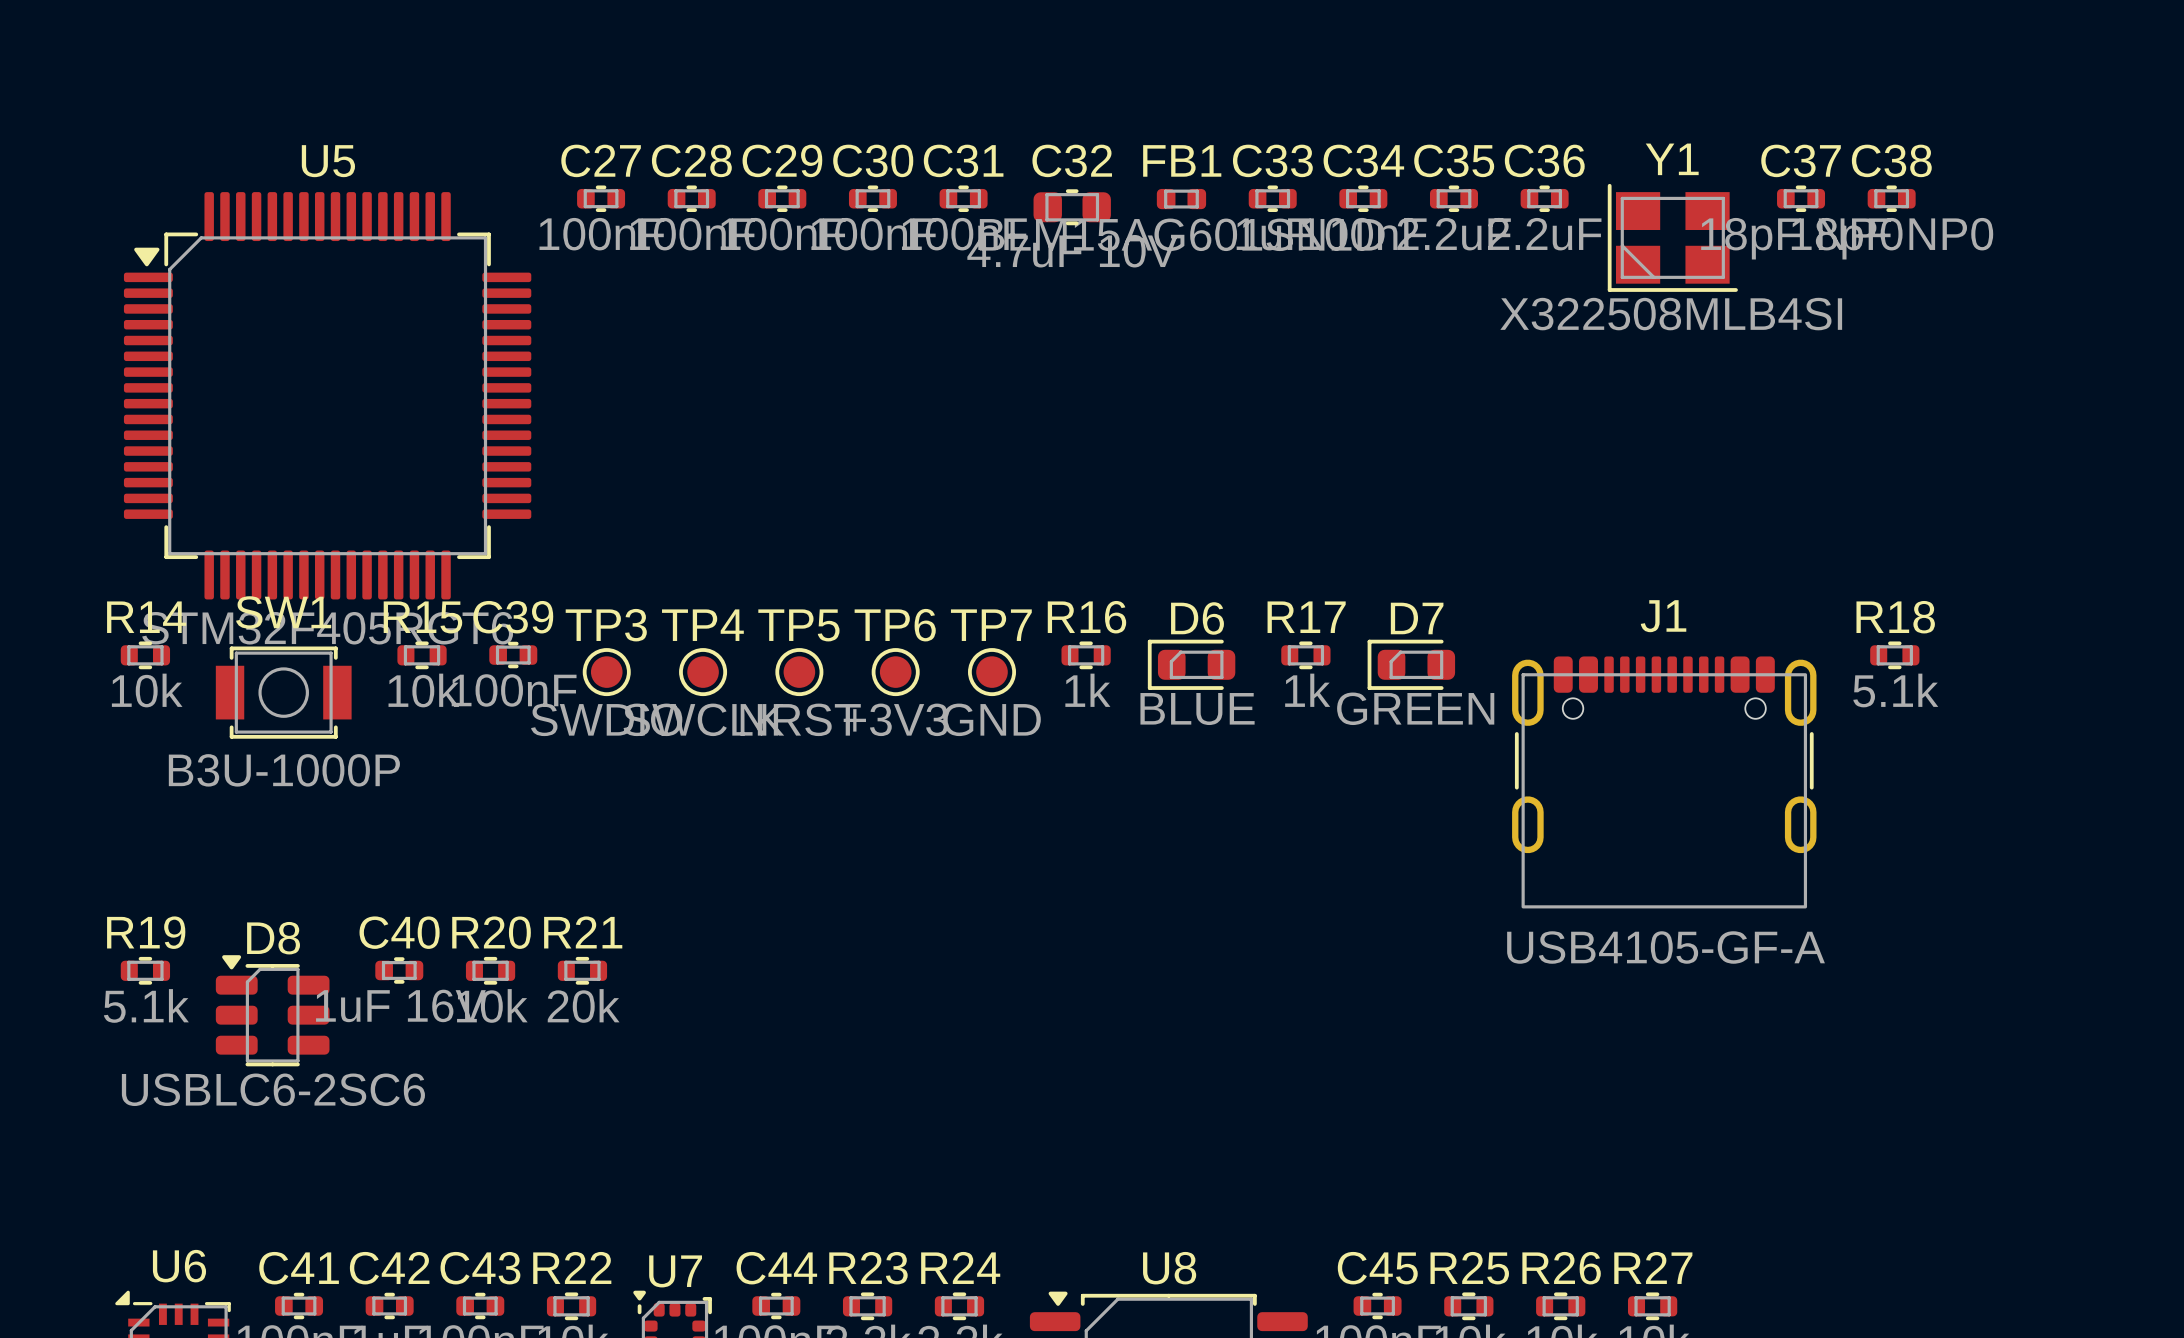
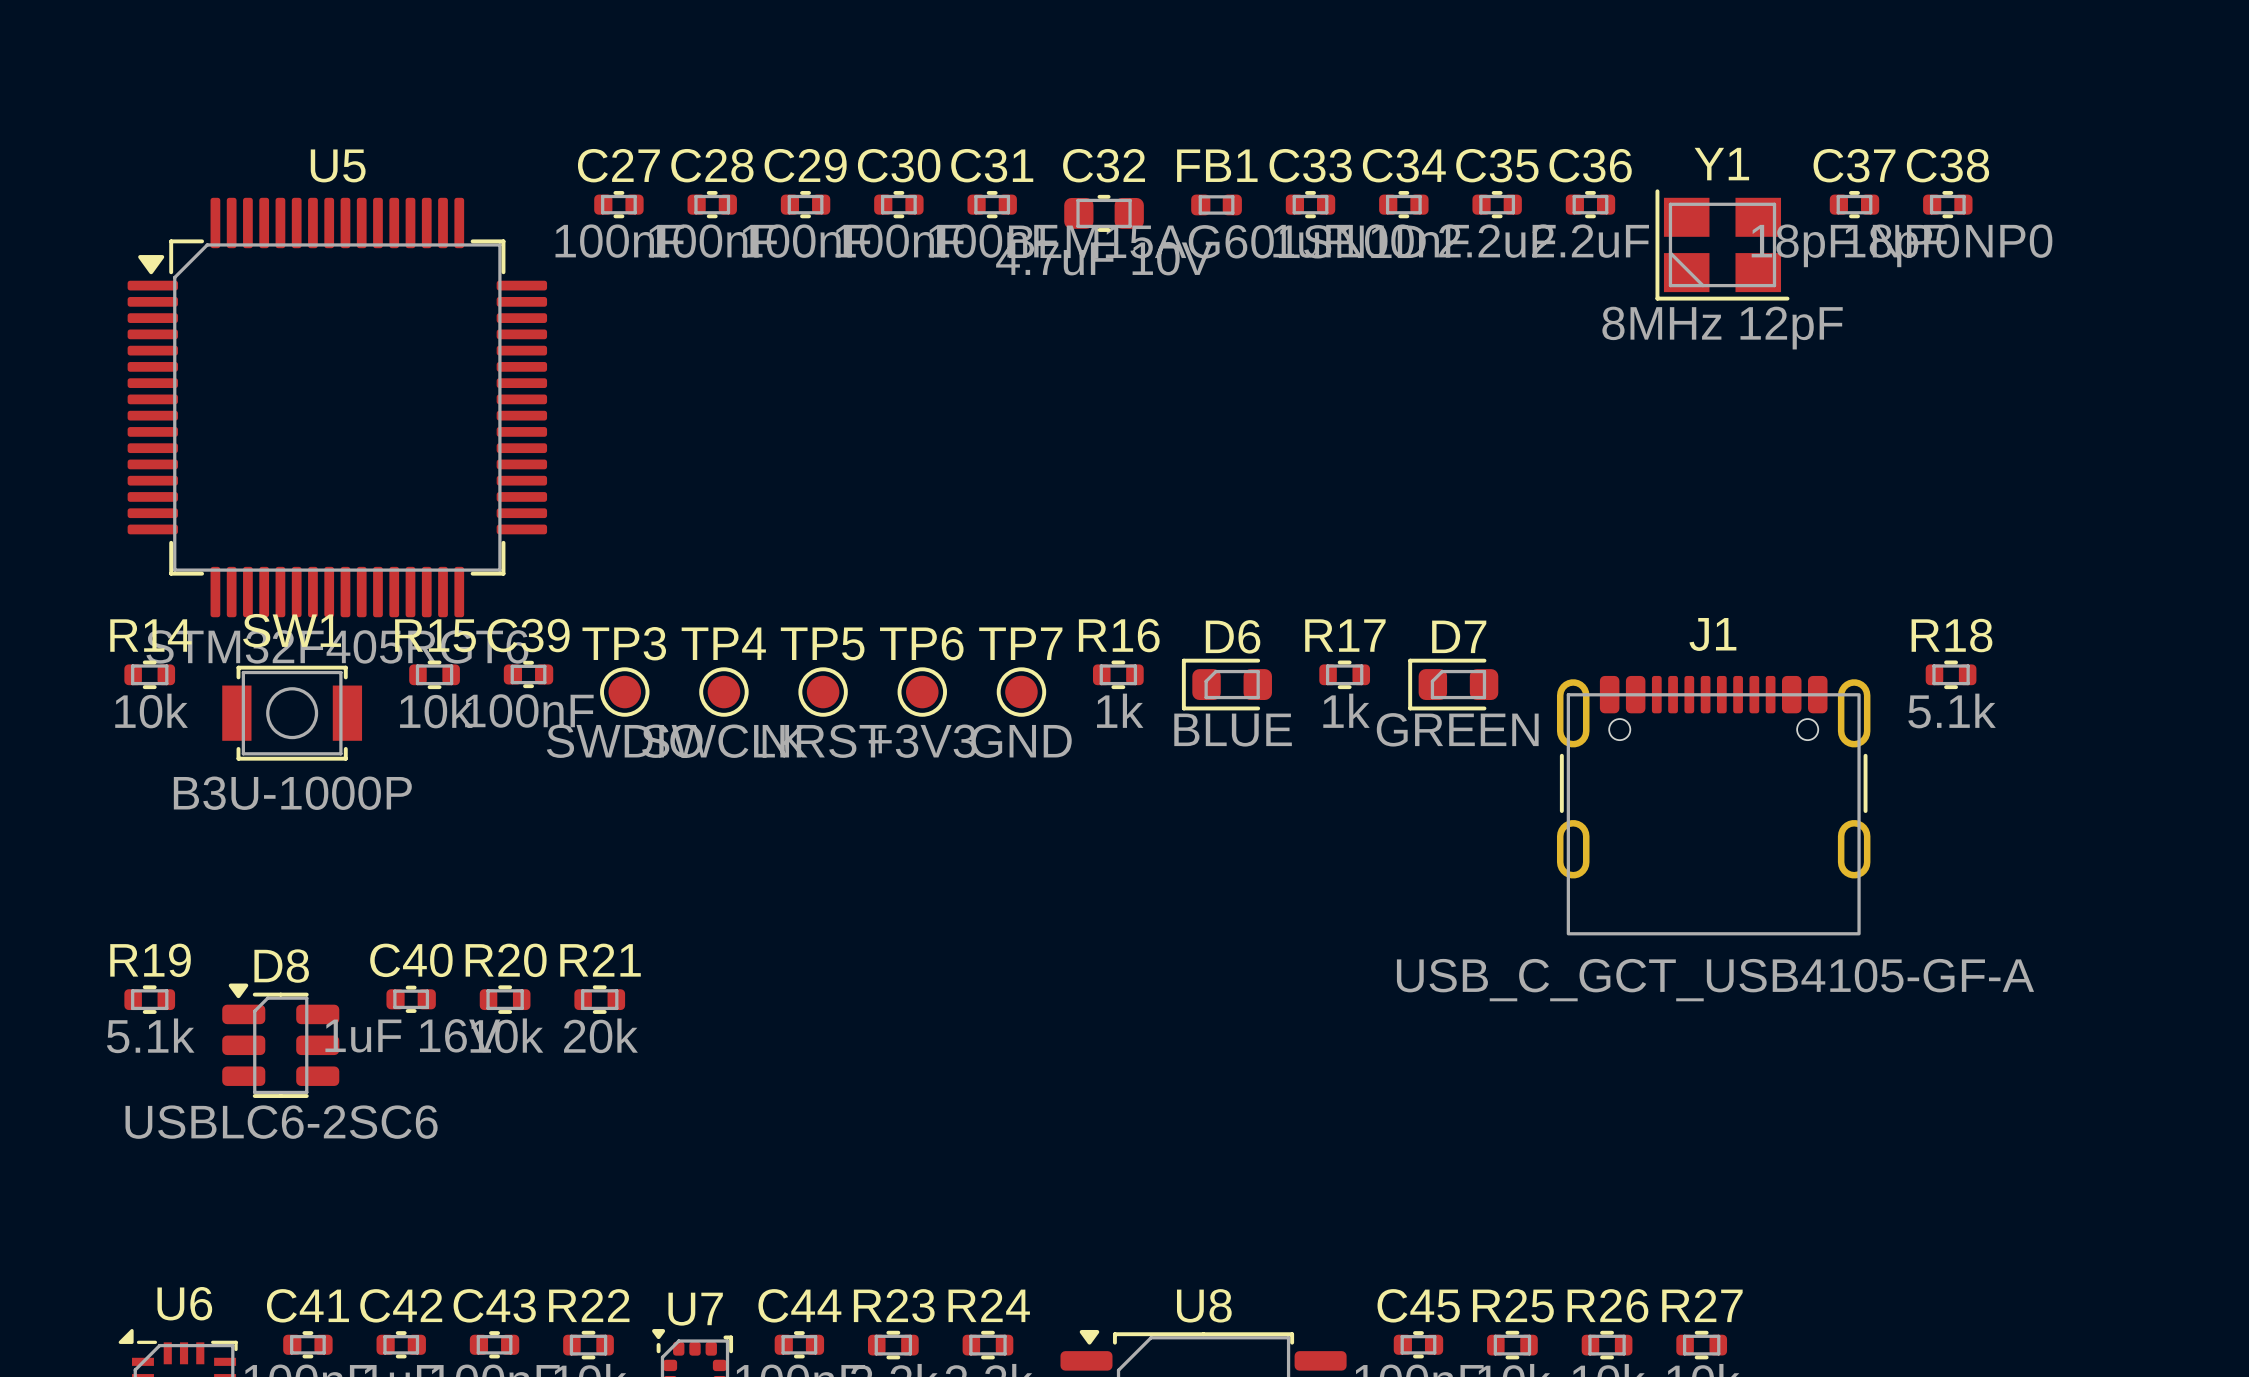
Y1 value: X322508MLB4SI (1671, 314) -> 8MHz 12pF (1722, 328)
J1 value: USB4105-GF-A (1666, 947) -> USB_C_GCT_USB4105-GF-A (1715, 980)

